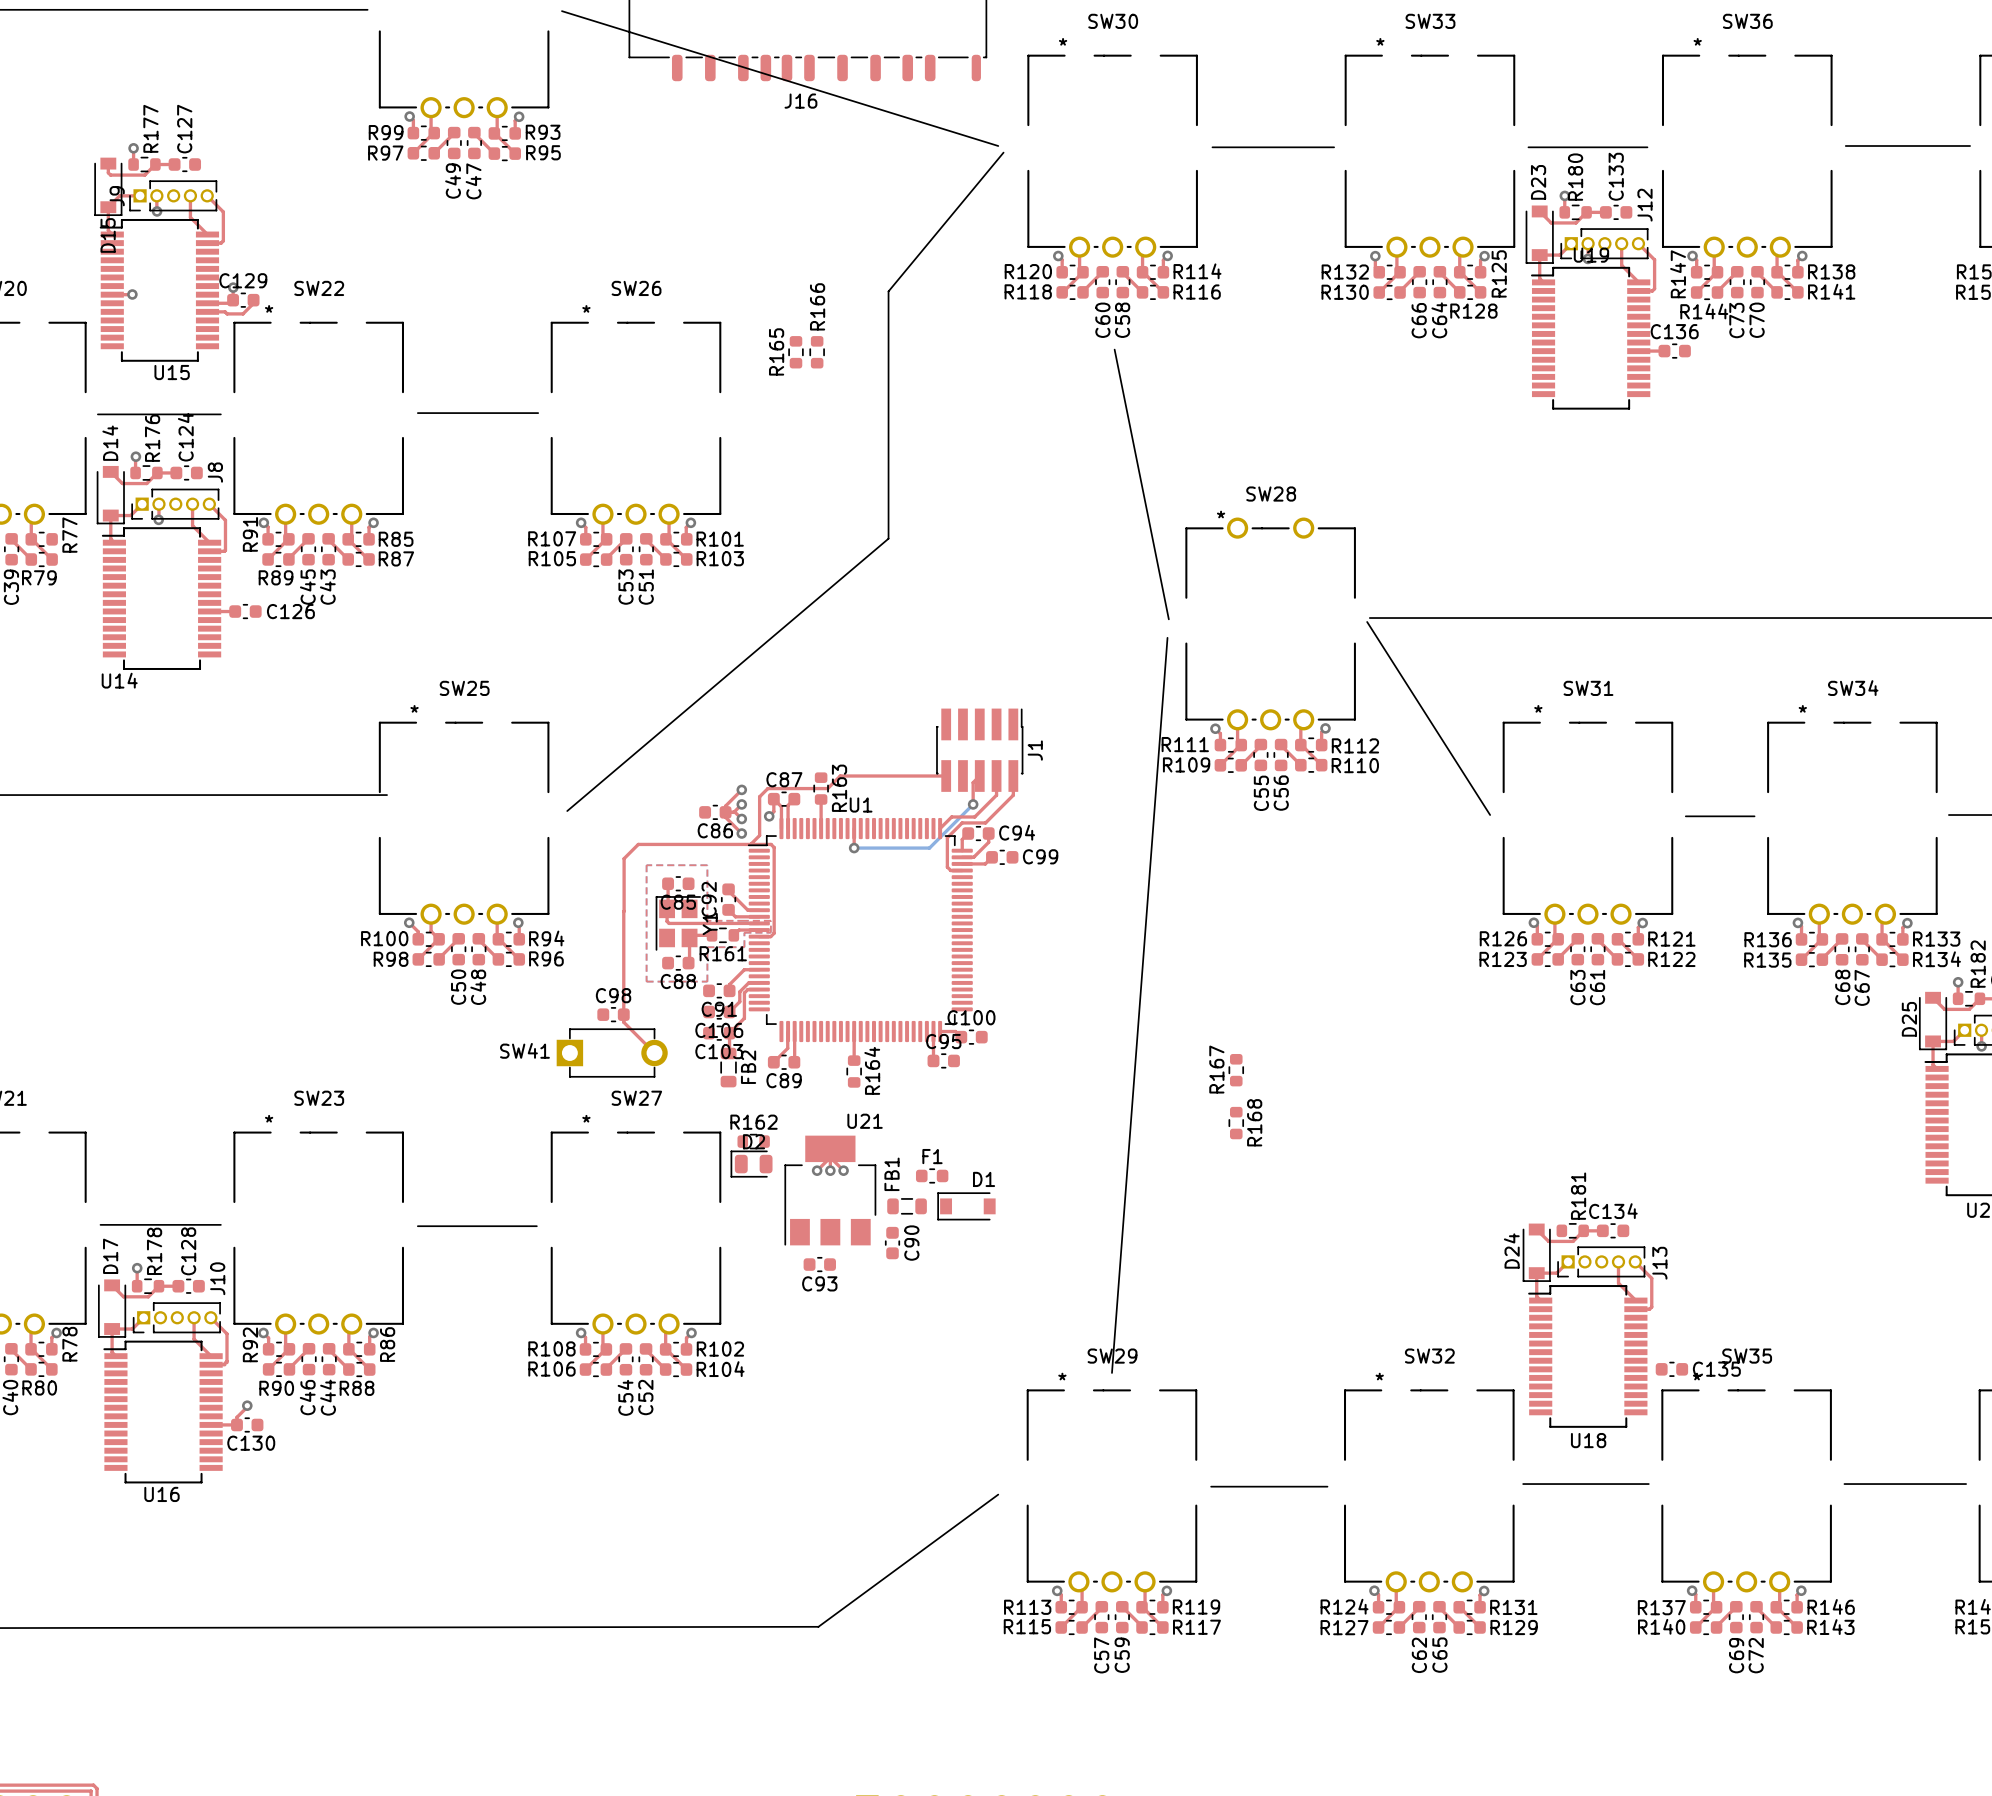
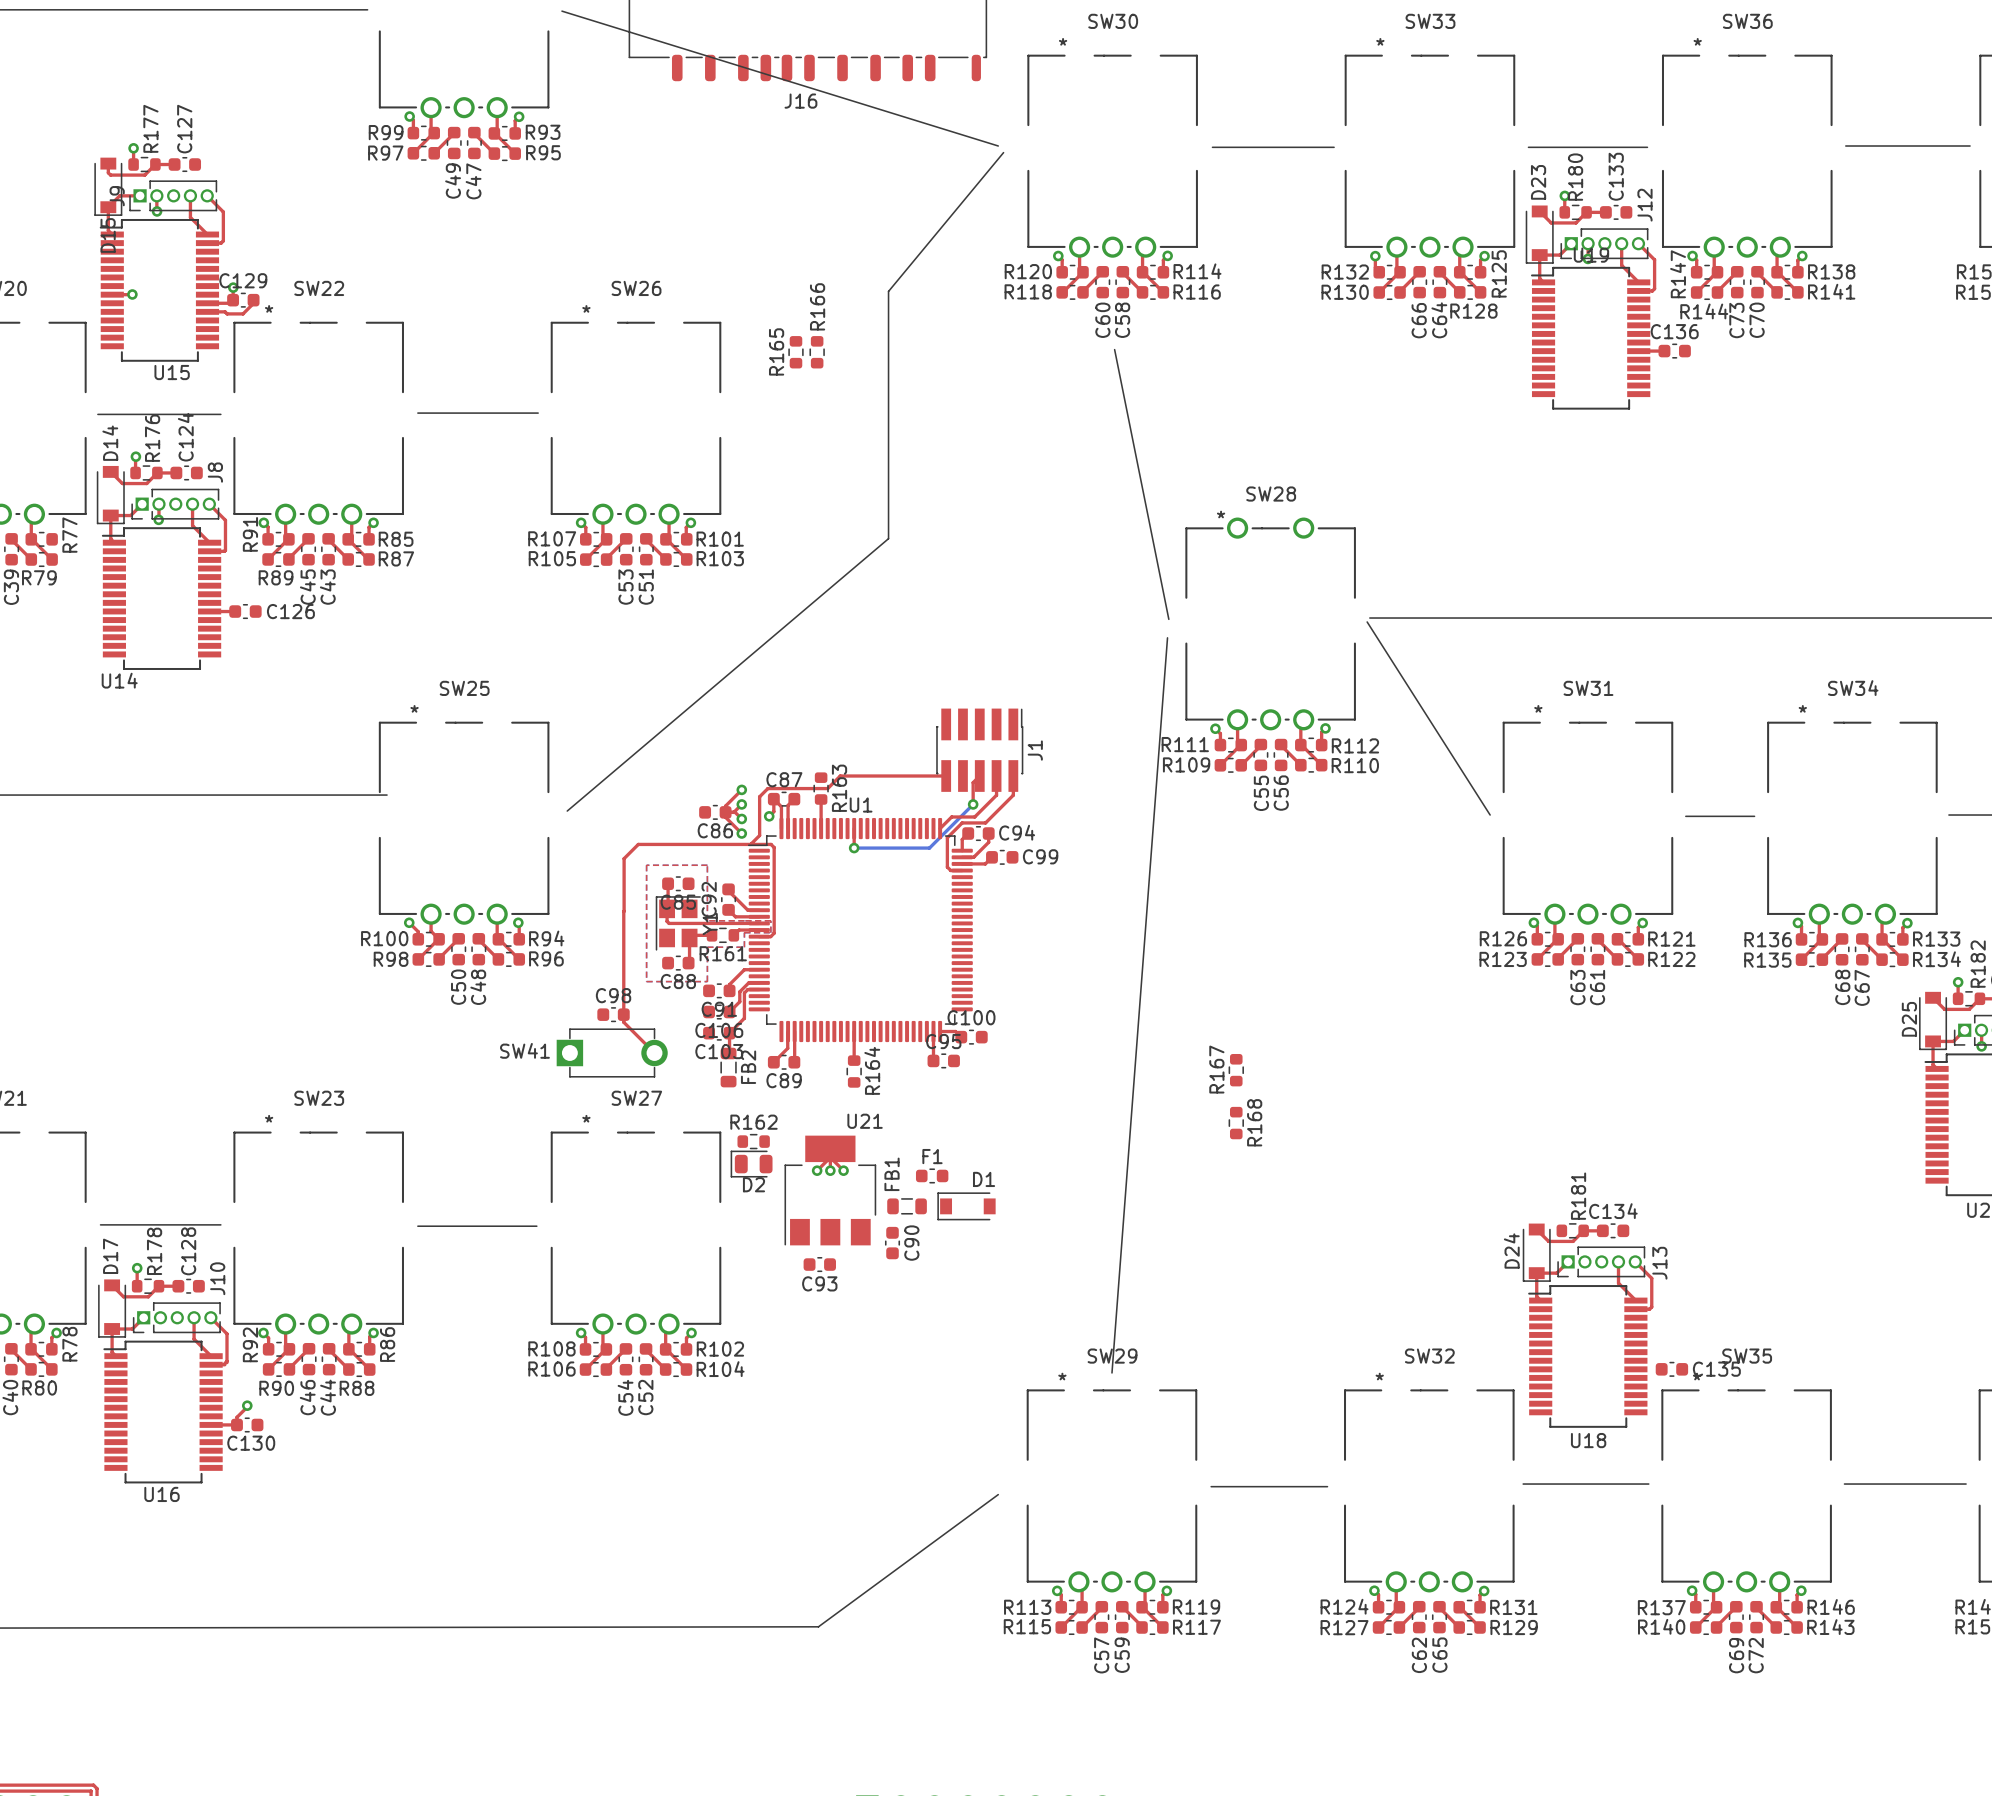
D2 name position: D2 (753, 1141) -> D2 (753, 1184)

